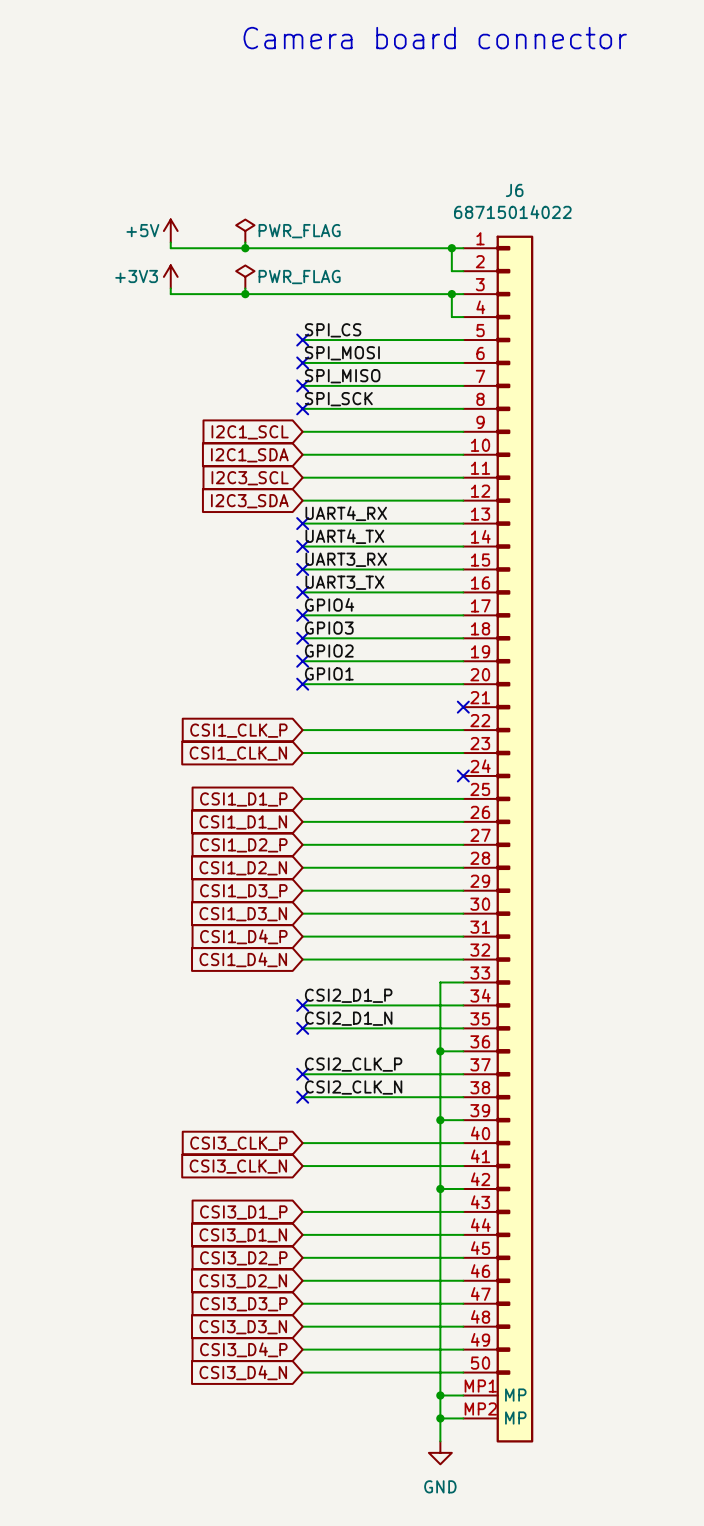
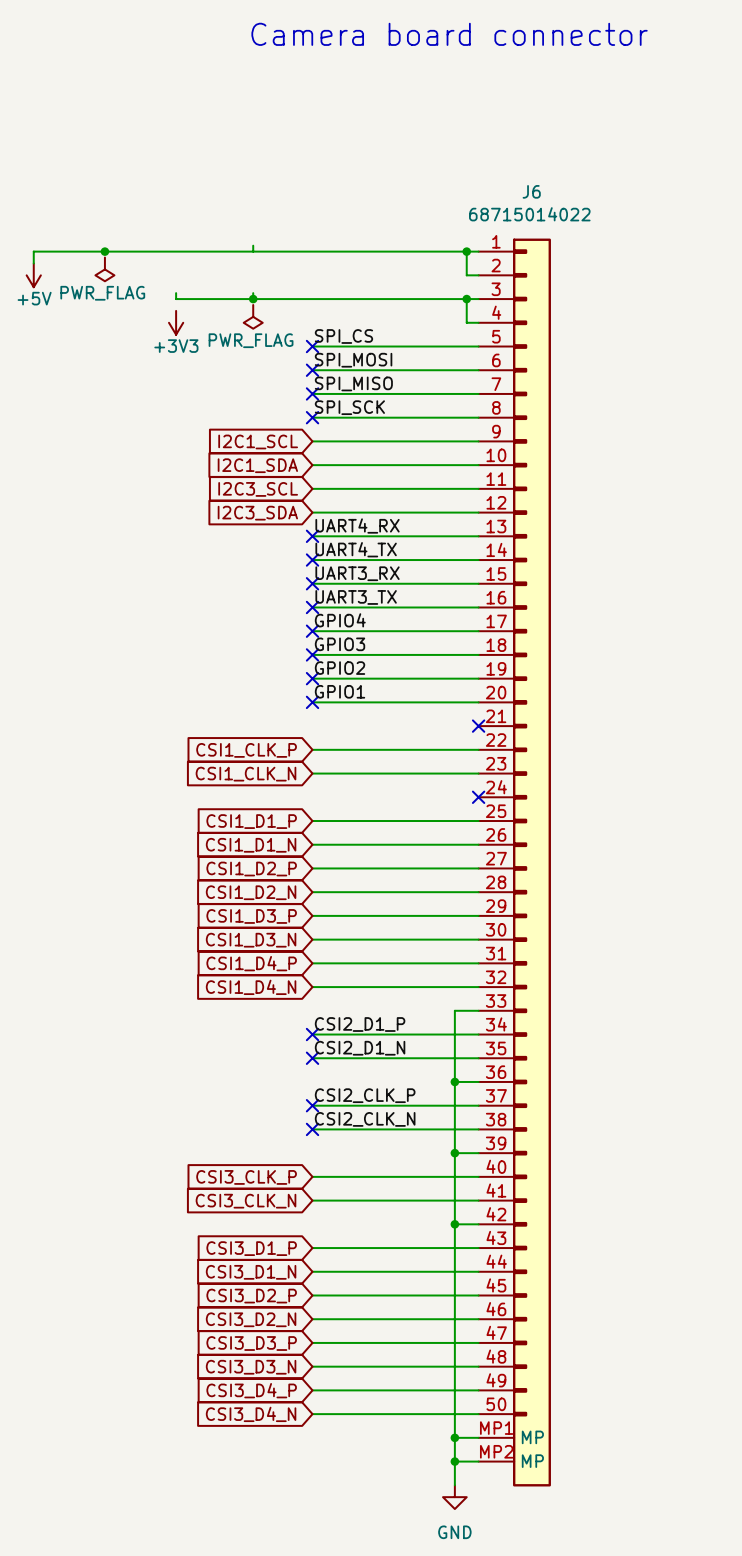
power symbol text position: +5V (142, 230) -> +5V (34, 298)
power symbol rotation: 0° (170, 231) -> 180° (33, 275)
power symbol position: +5V (170, 231) -> +5V (33, 275)
power symbol: PWR_FLAG (245, 231) -> none
wire: (170, 242) (170, 248) -> (33, 263) (33, 251) (176, 251)
junction: none -> (104, 251)
junction: (245, 248) -> none
power symbol: none -> PWR_FLAG (104, 269)
power symbol text position: +3V3 (136, 276) -> +3V3 (176, 346)
power symbol rotation: 0° (170, 276) -> 180° (176, 322)
power symbol position: +3V3 (170, 276) -> +3V3 (176, 322)
power symbol rotation: 0° (245, 276) -> 180° (253, 316)
power symbol position: PWR_FLAG (245, 276) -> PWR_FLAG (253, 316)
power symbol text position: PWR_FLAG (299, 277) -> PWR_FLAG (251, 340)

